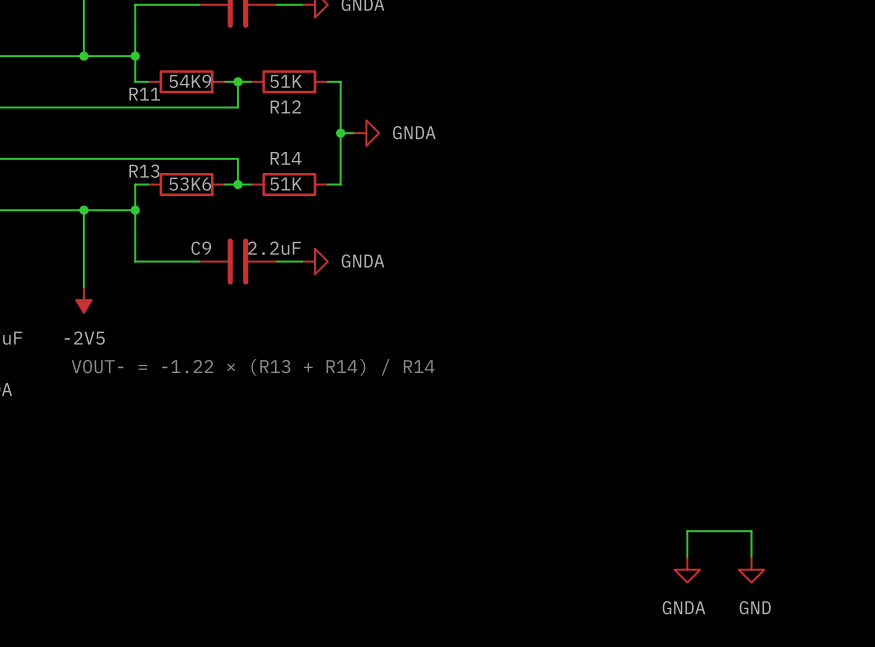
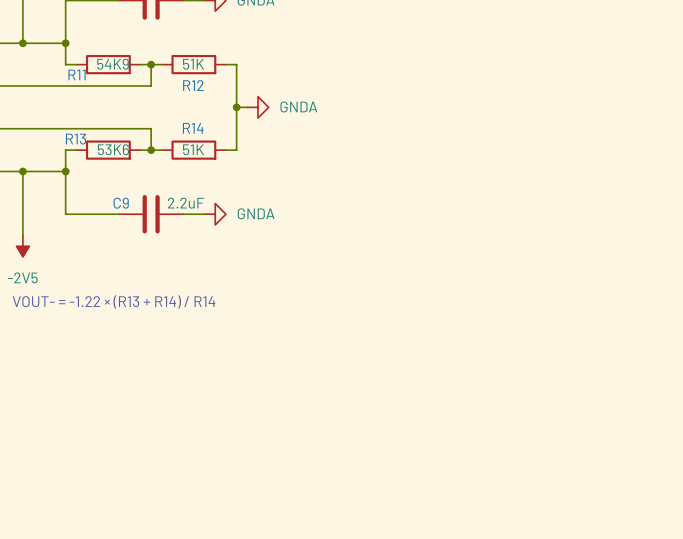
wire: (687, 556) (687, 531) (751, 531) (751, 556) -> none
power symbol: GNDA (687, 569) -> none
power symbol: GND (751, 569) -> none

